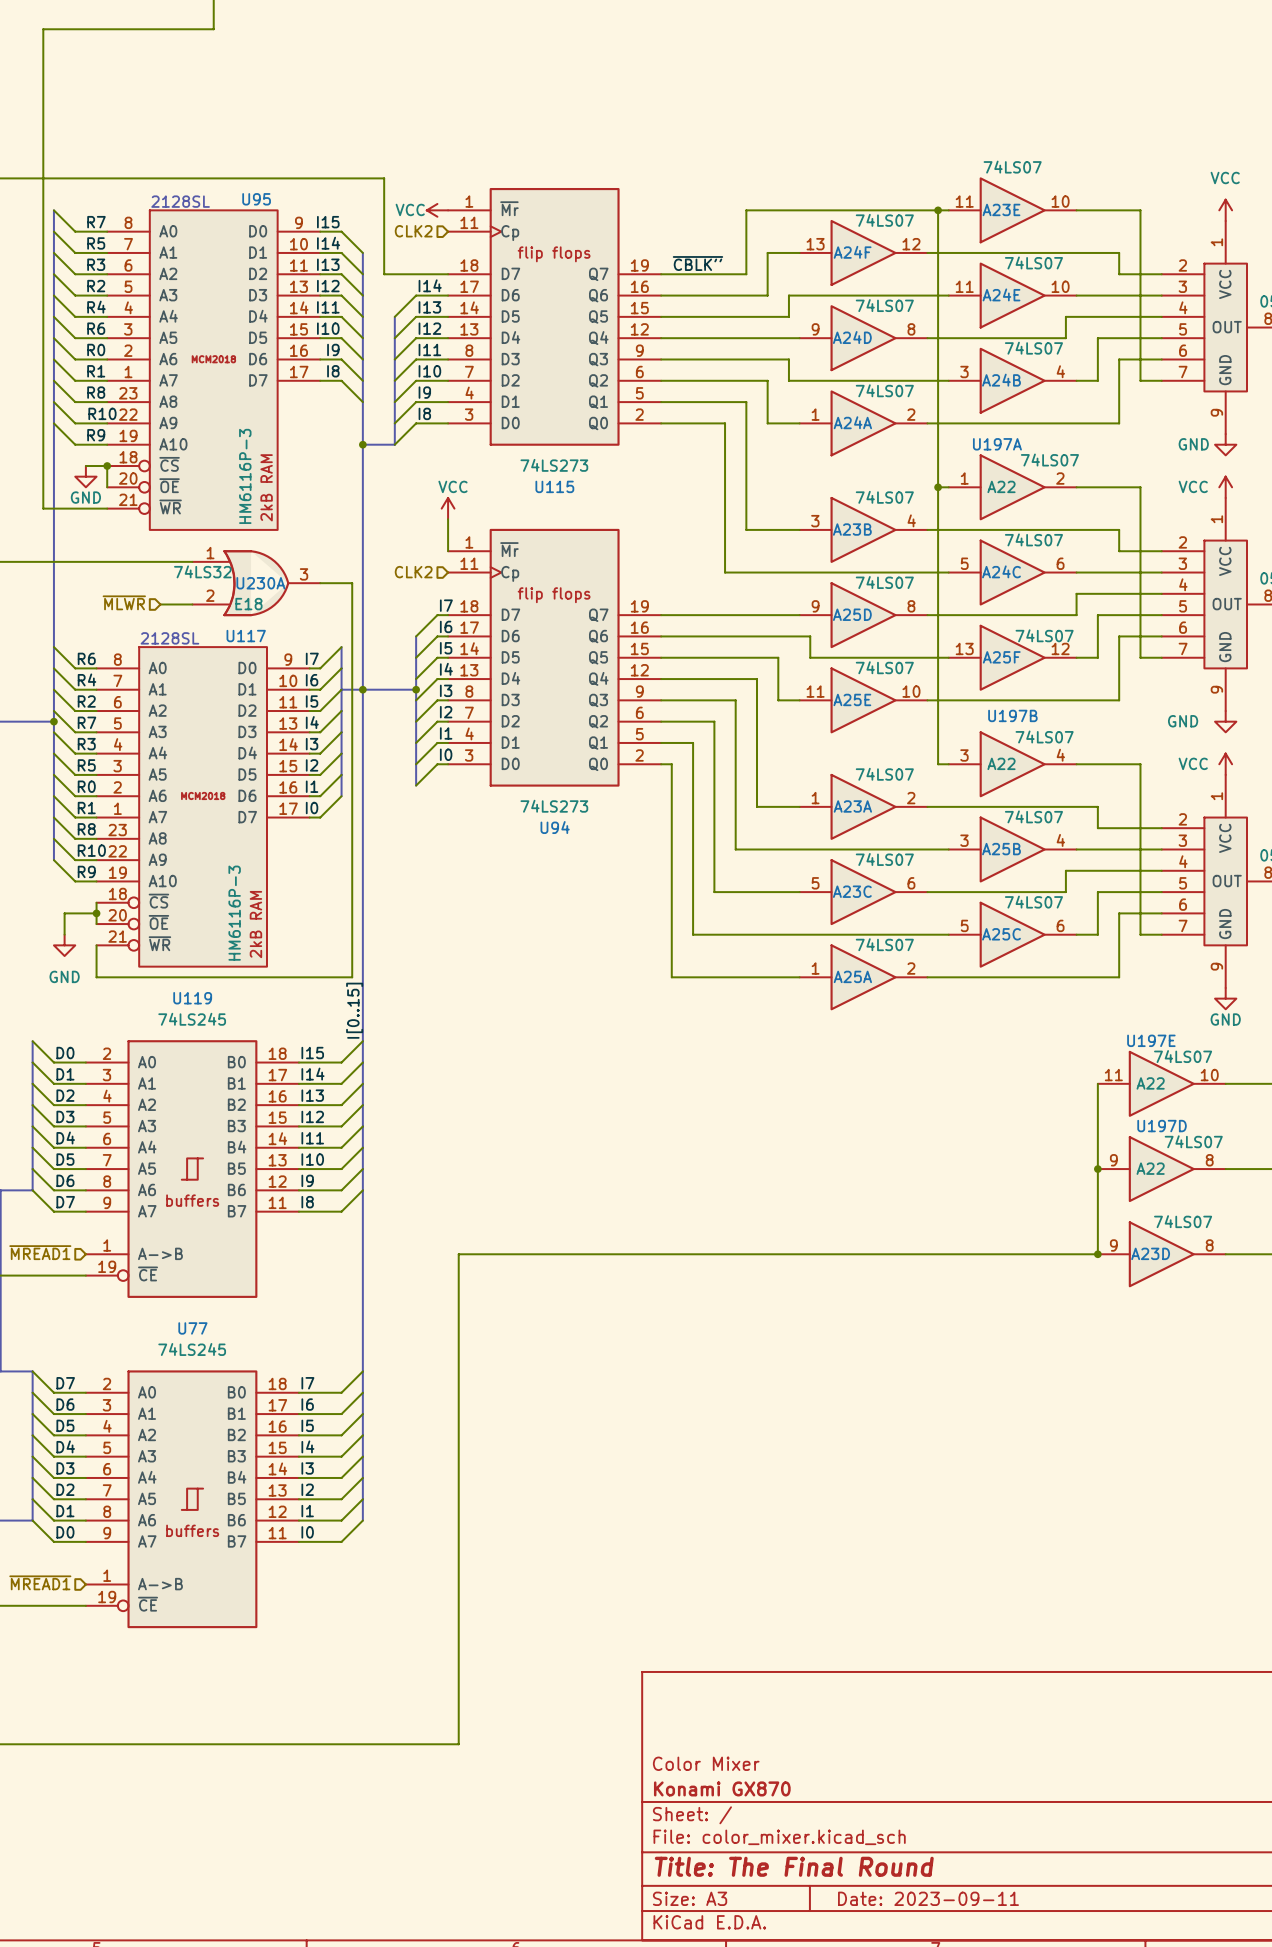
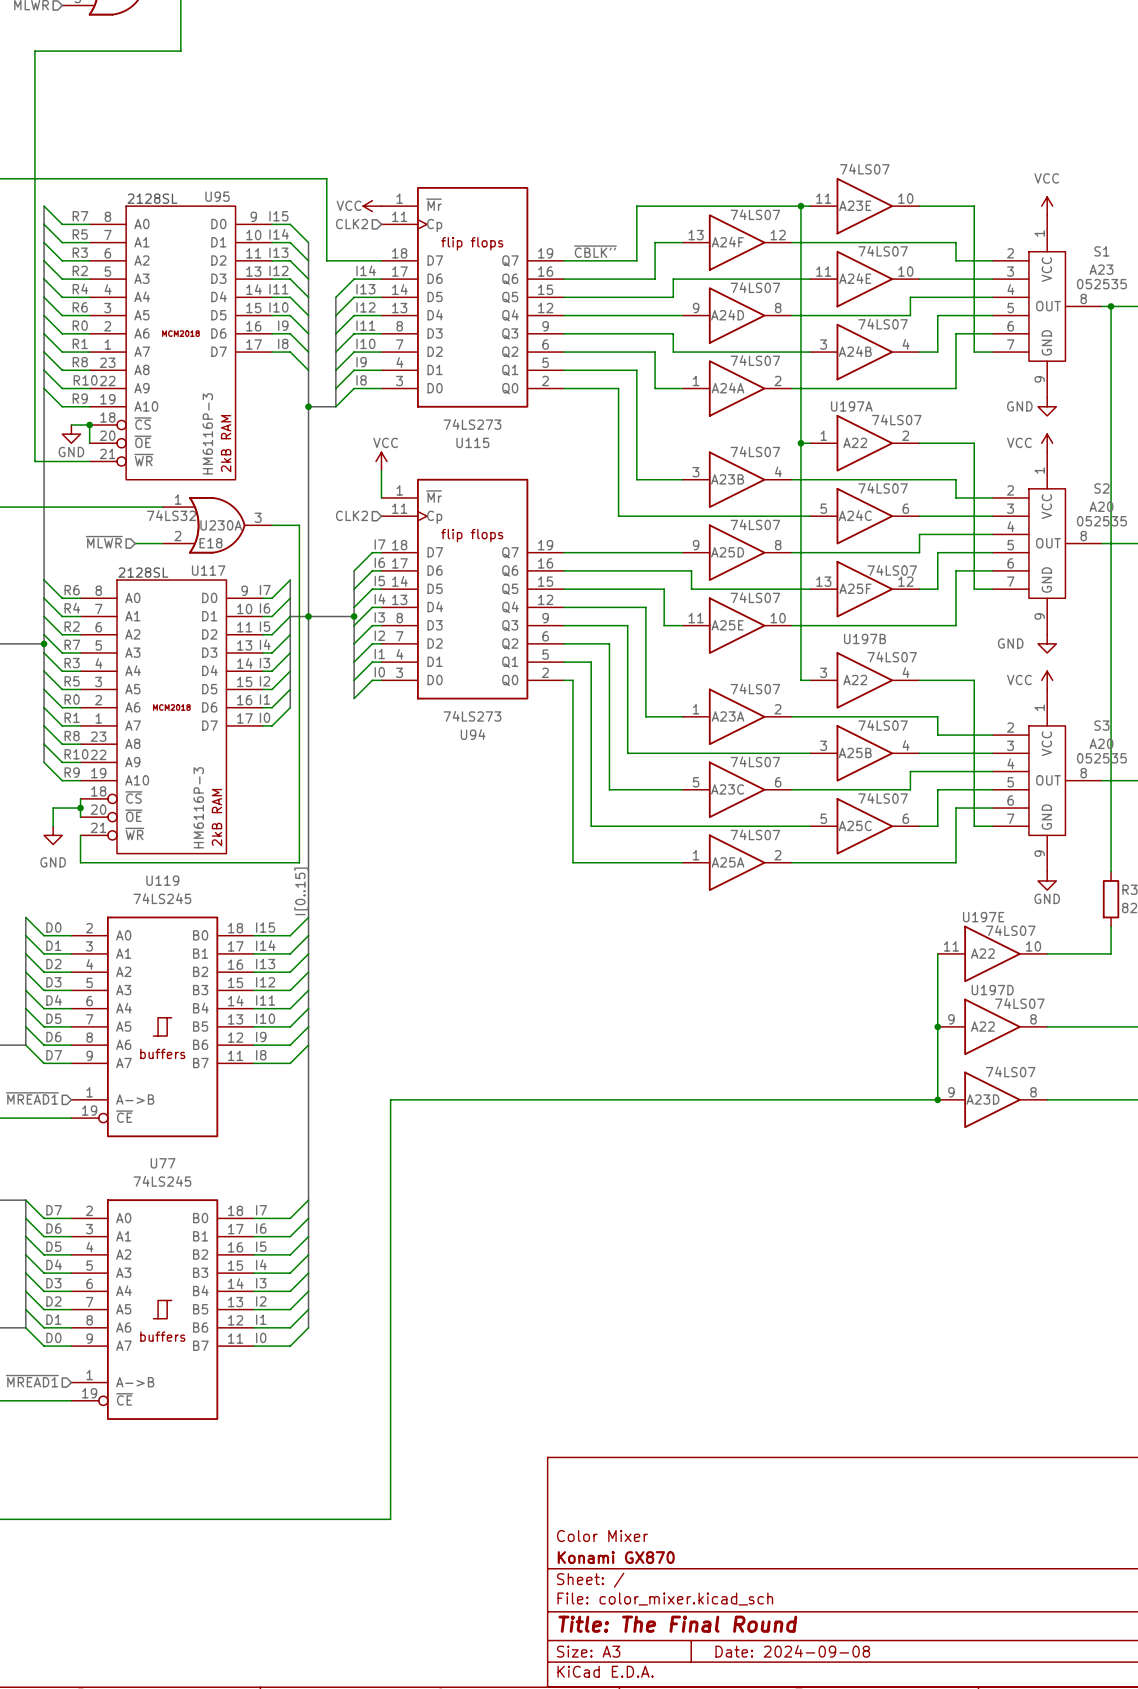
title block: Date: 2023-09-11 (928, 1898) -> Date: 2024-09-08 (792, 1651)

